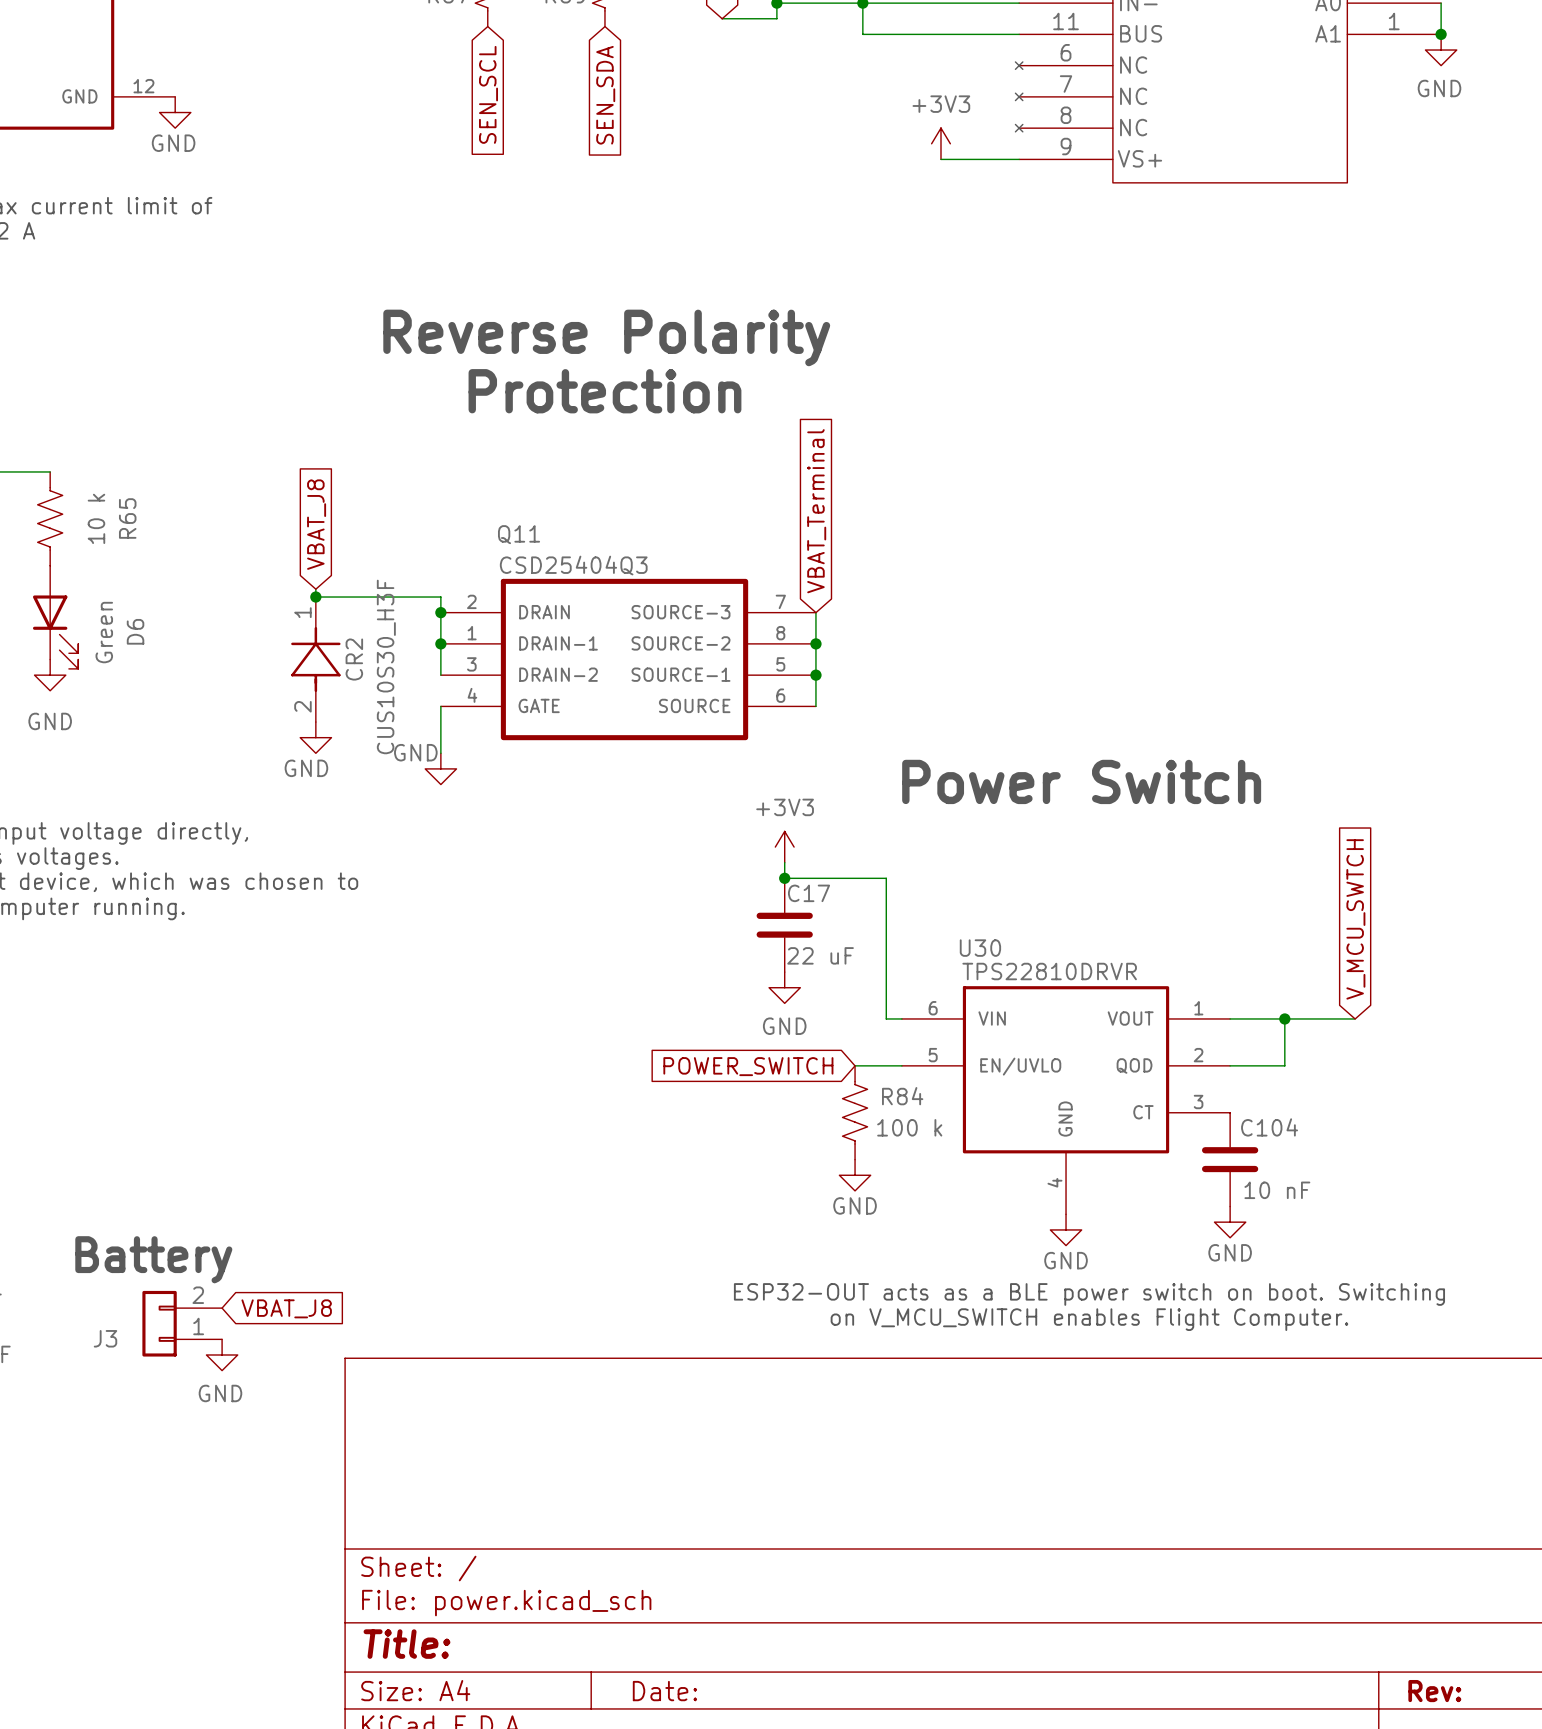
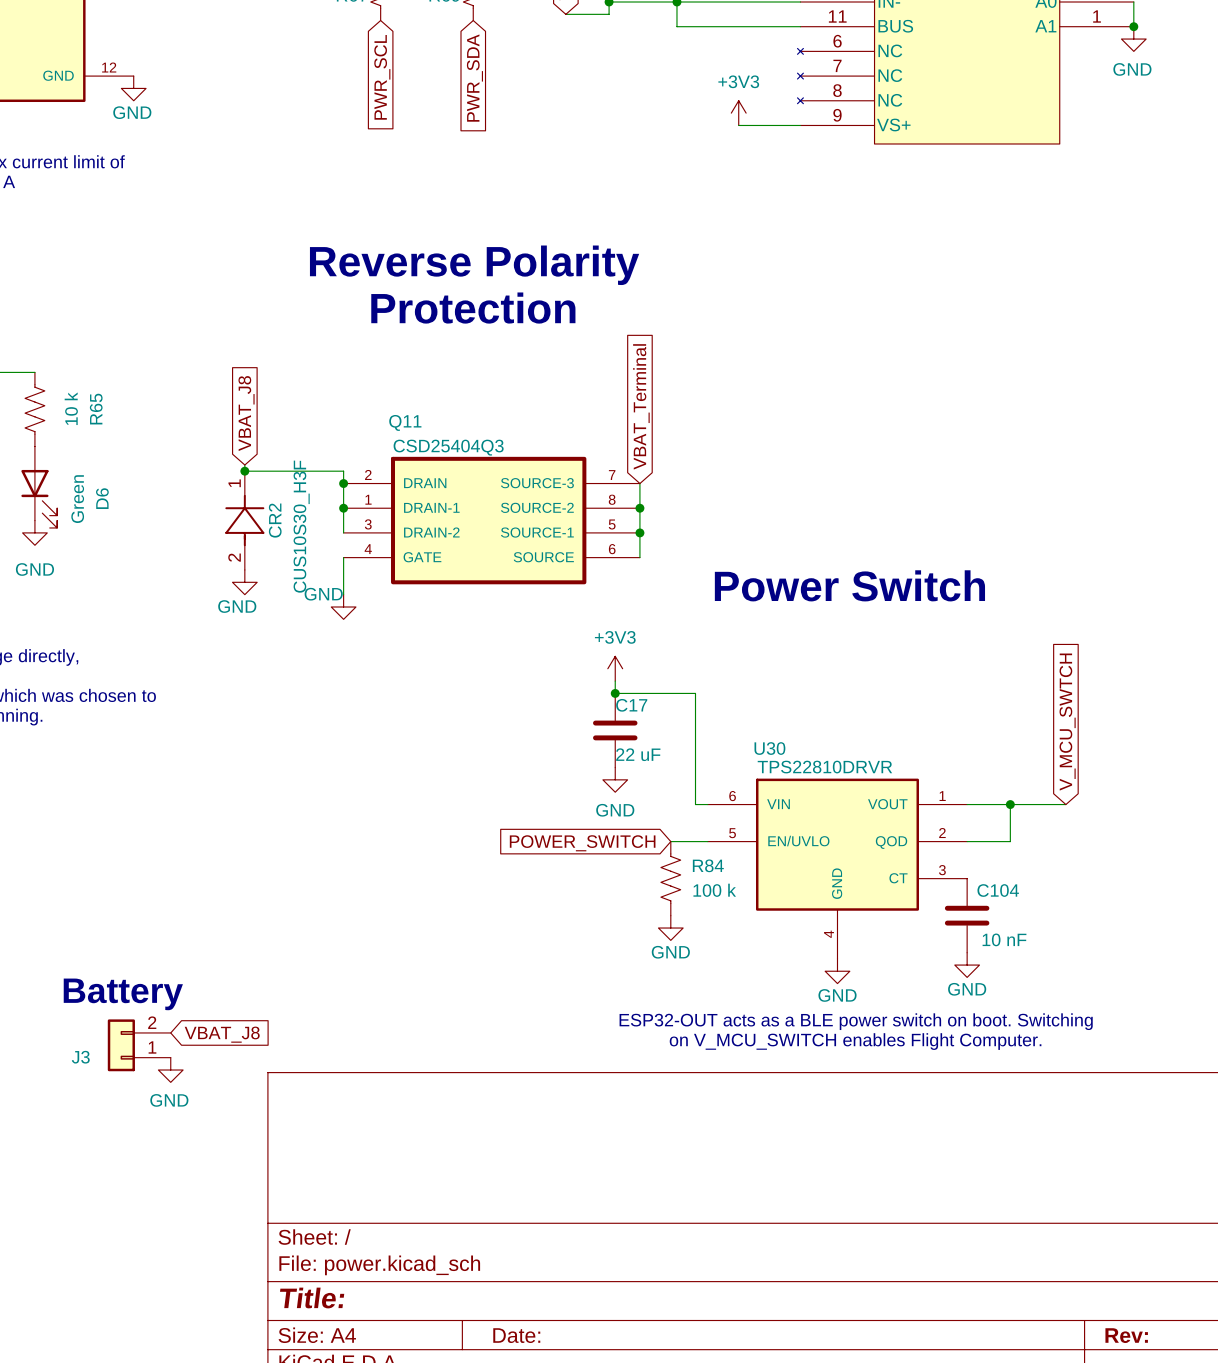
global label: SEN_SCL (488, 94) -> PWR_SCL (382, 77)
global label: SEN_SDA (605, 95) -> PWR_SDA (474, 78)
text position: Power Switch (1081, 781) -> Power Switch (849, 585)

